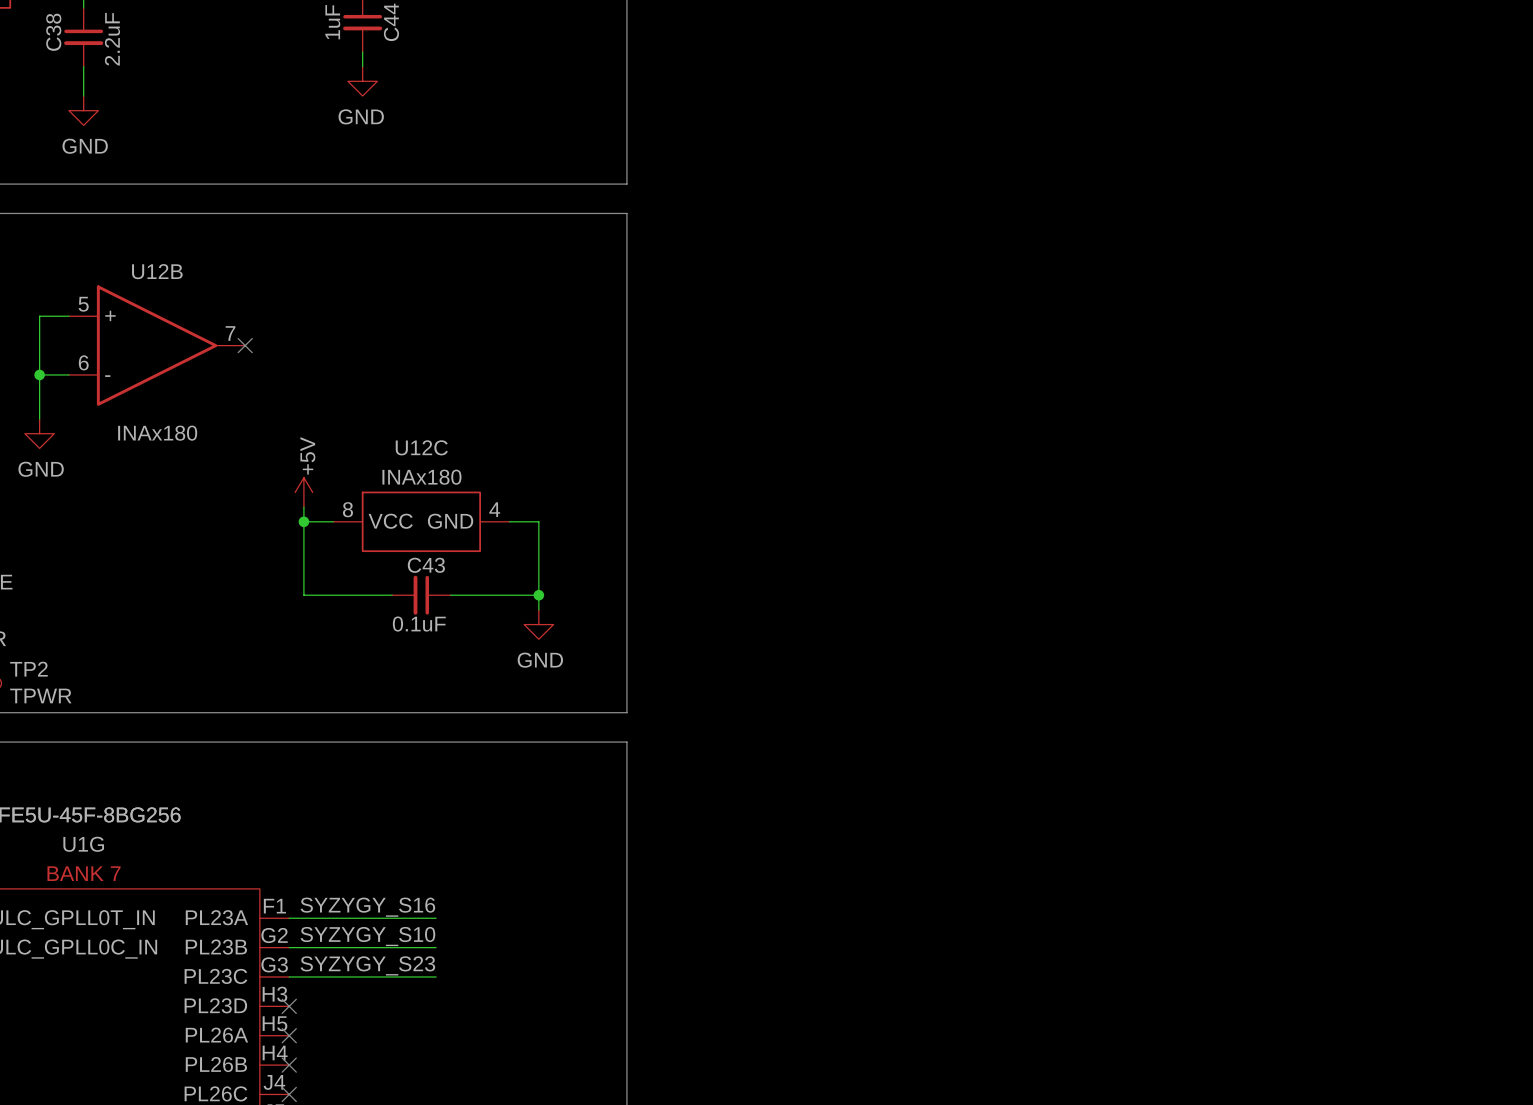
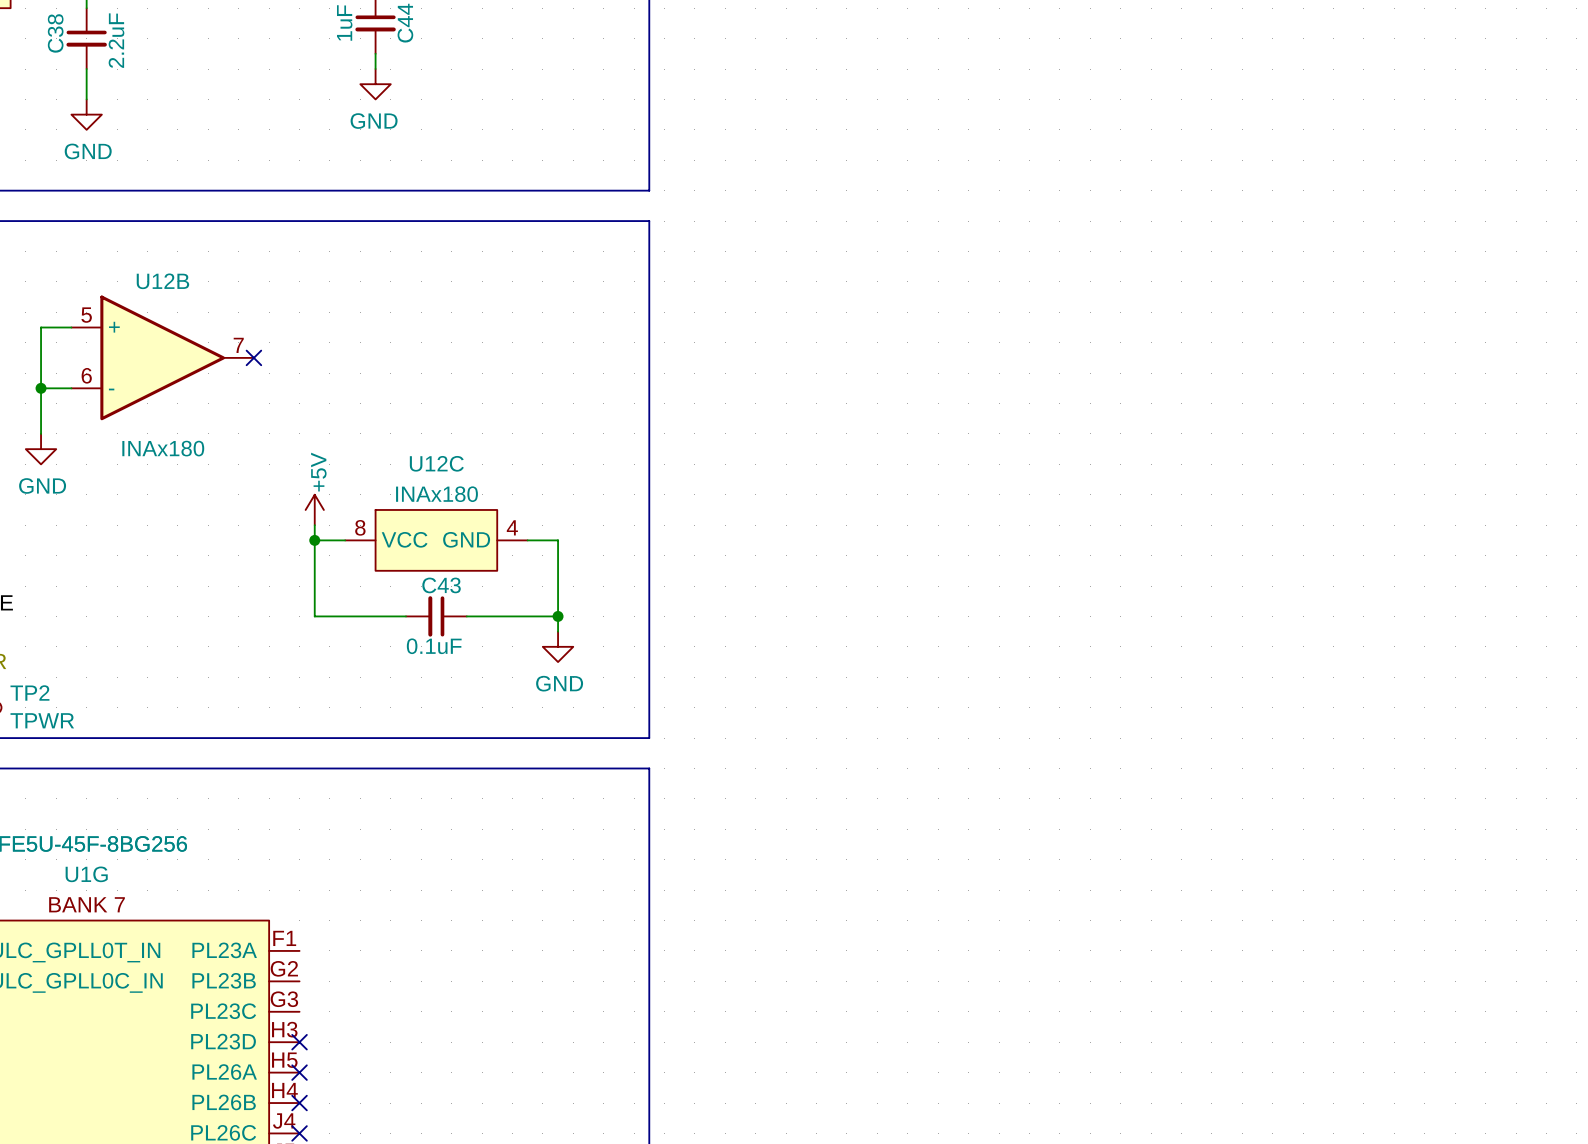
label: SYZYGY_S16 (367, 907) -> none
wire: (289, 918) (436, 918) -> none
label: SYZYGY_S10 (367, 936) -> none
wire: (289, 947) (436, 947) -> none
label: SYZYGY_S23 (367, 965) -> none
wire: (289, 976) (436, 976) -> none

